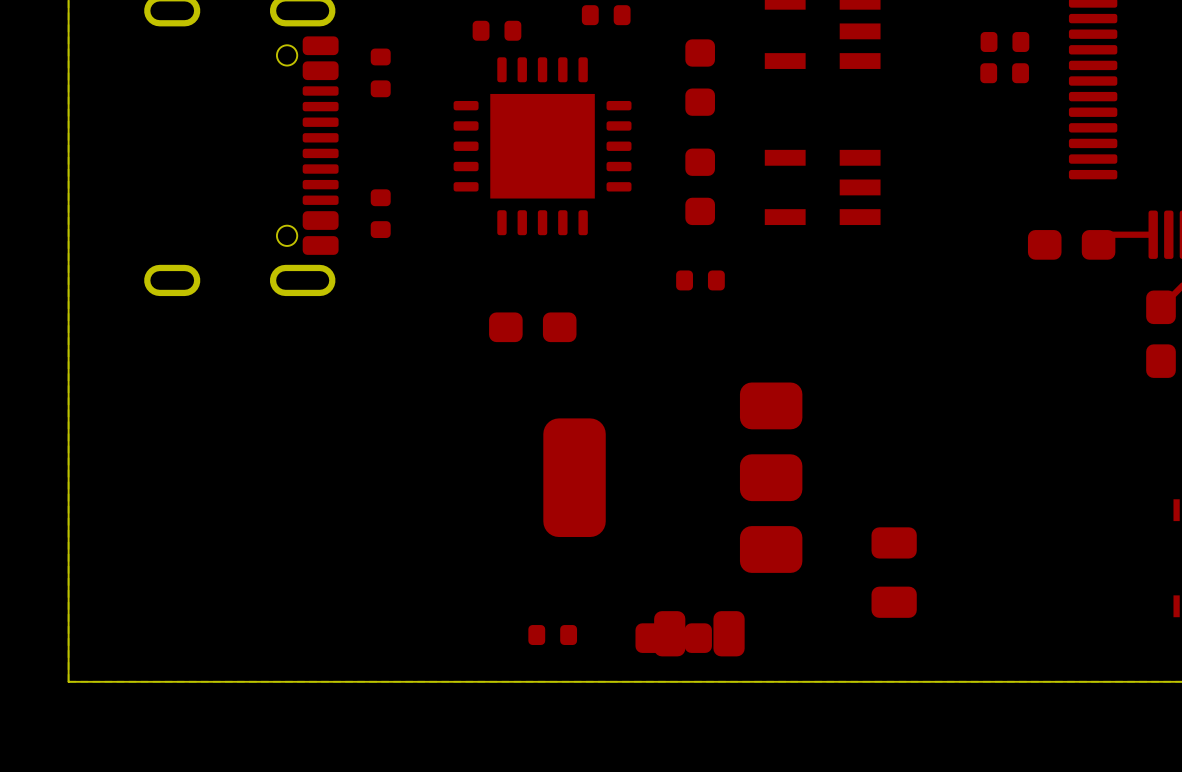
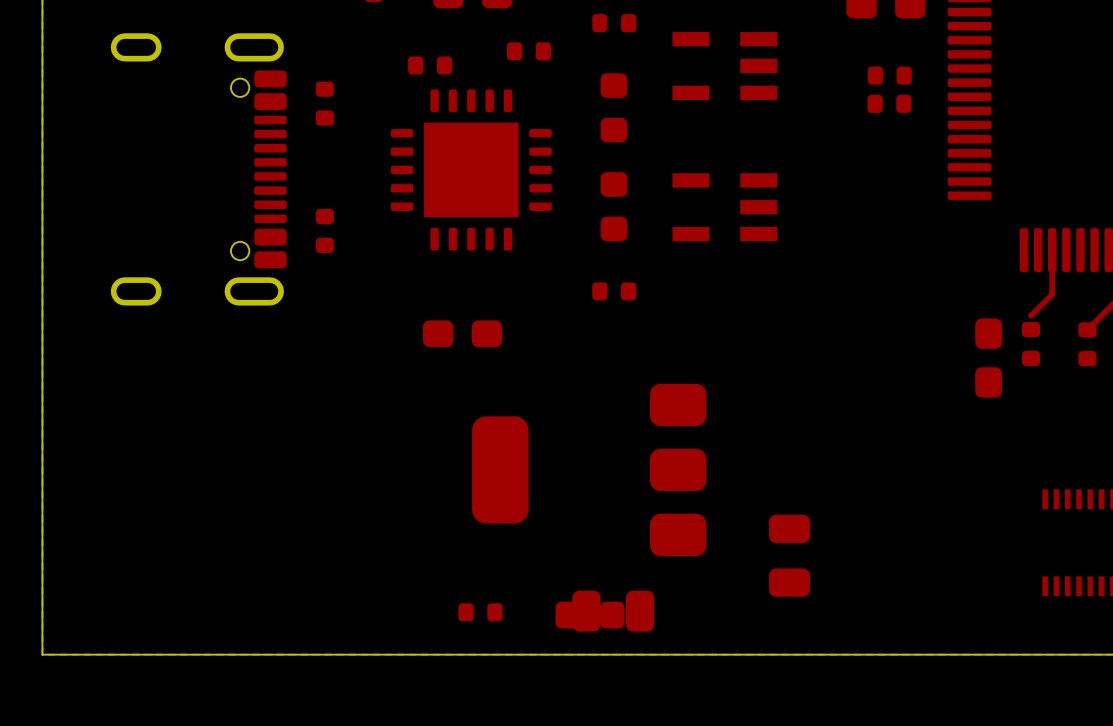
top track: (1153, 234) (1108, 234) (1098, 244) -> none
part rotation: 0° (1071, 244) -> 90° clockwise (988, 358)
part position: (1071, 244) -> (988, 358)
part footprint: [1146, 290, 1176, 378] -> [1021, 321, 1041, 366]

